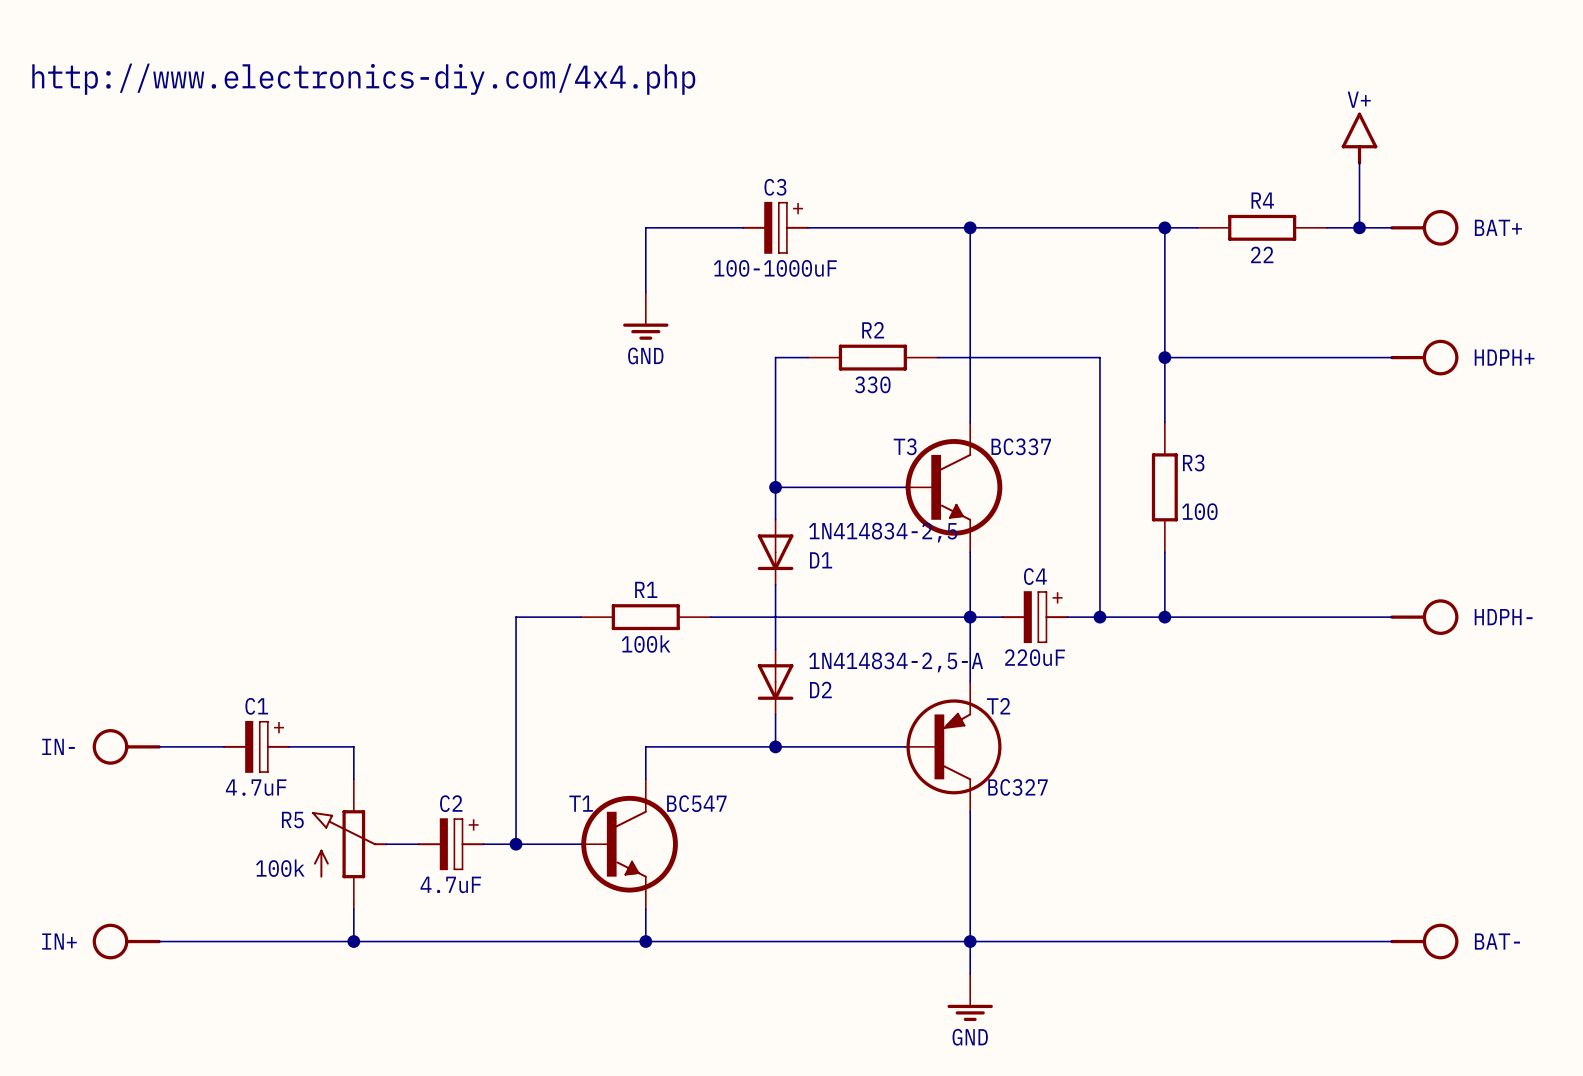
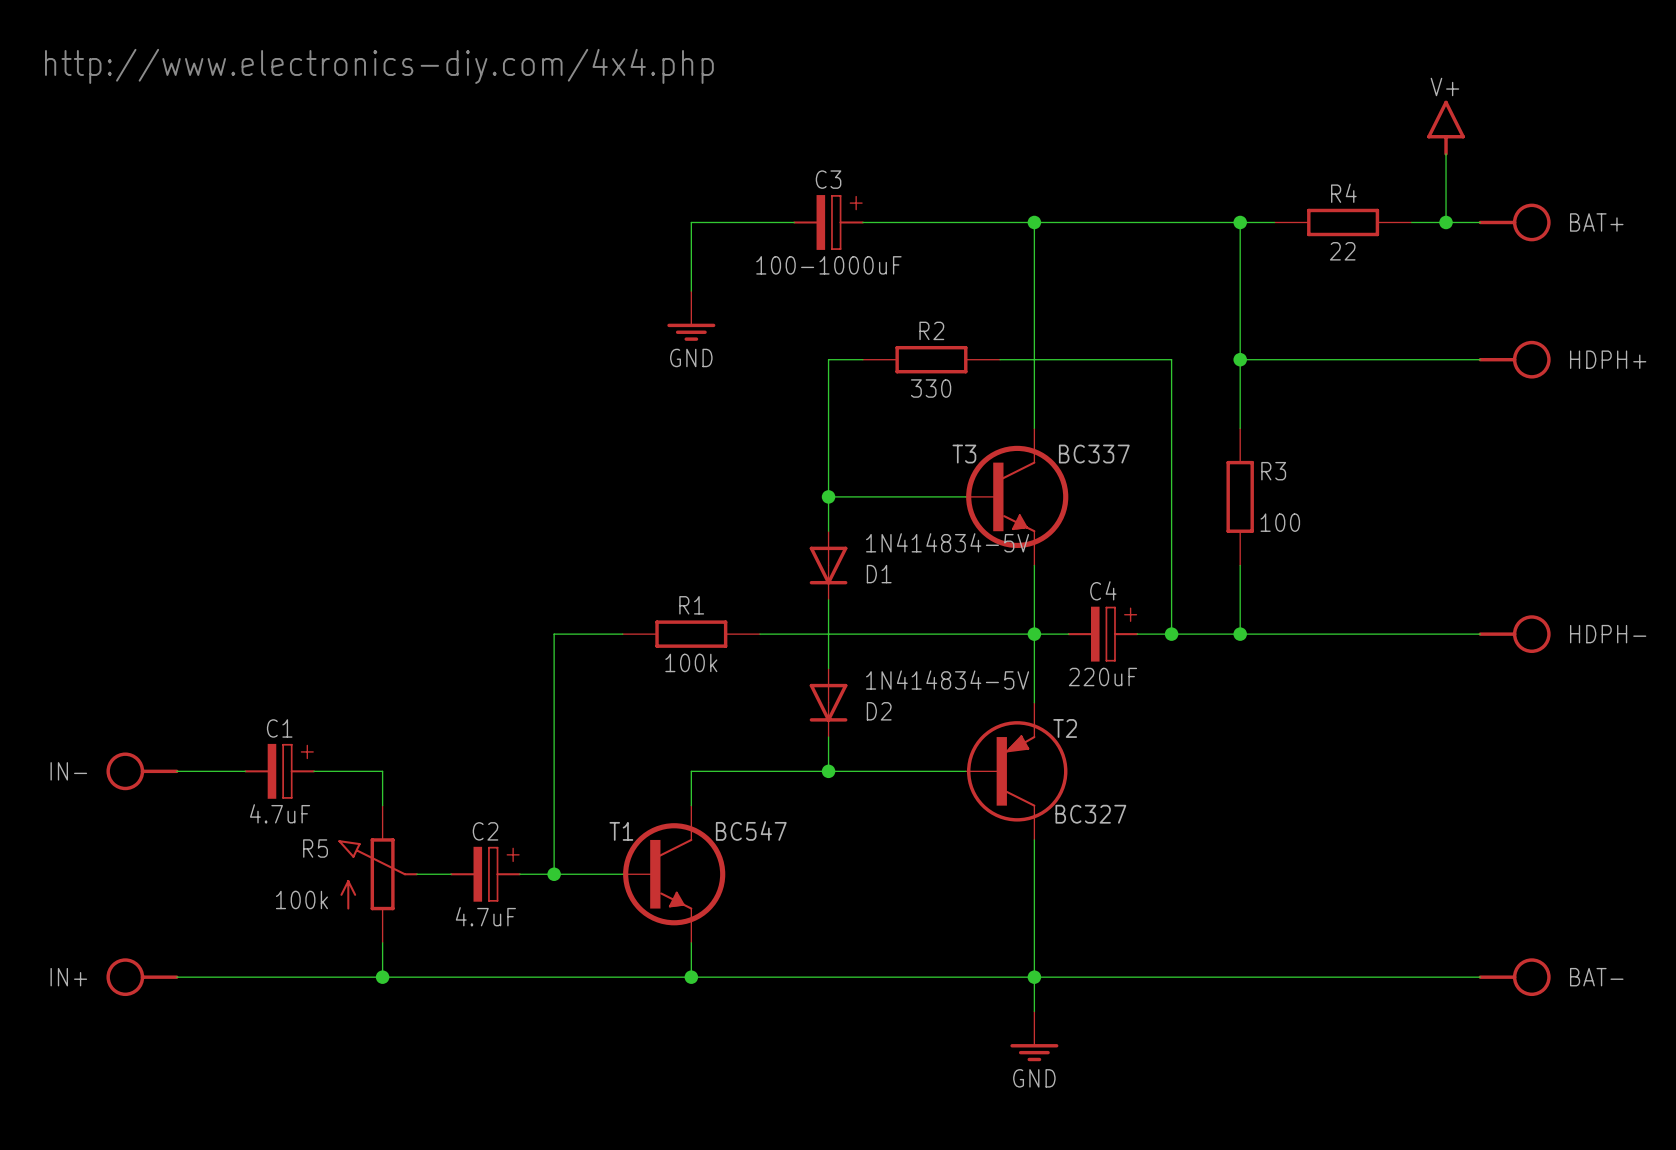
D1 value: 1N414834-2,5 (883, 532) -> 1N414834-5V (947, 542)
D2 value: 1N414834-2,5-A (896, 662) -> 1N414834-5V (947, 680)

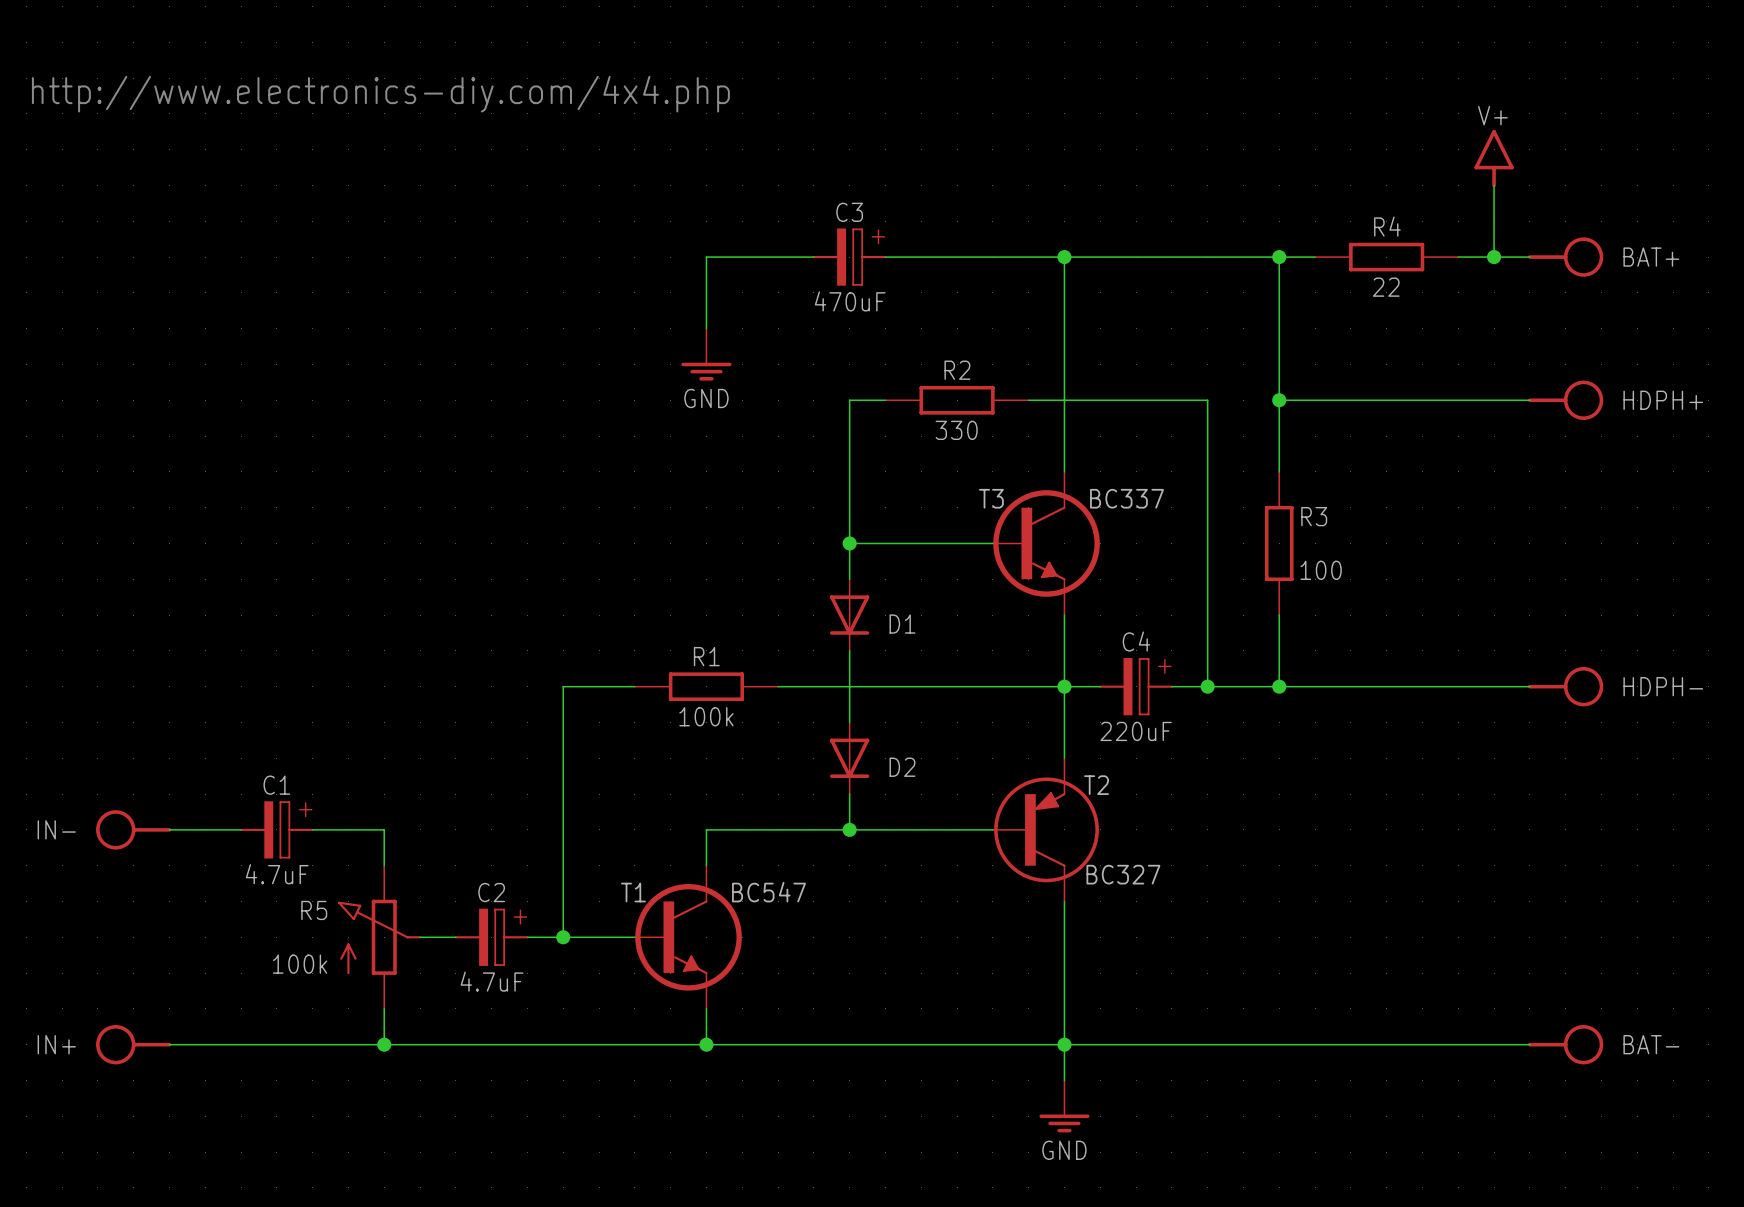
C3 value: 100-1000uF (828, 265) -> 470uF (850, 301)
D1 value: 1N414834-5V (947, 542) -> none
D2 value: 1N414834-5V (947, 680) -> none

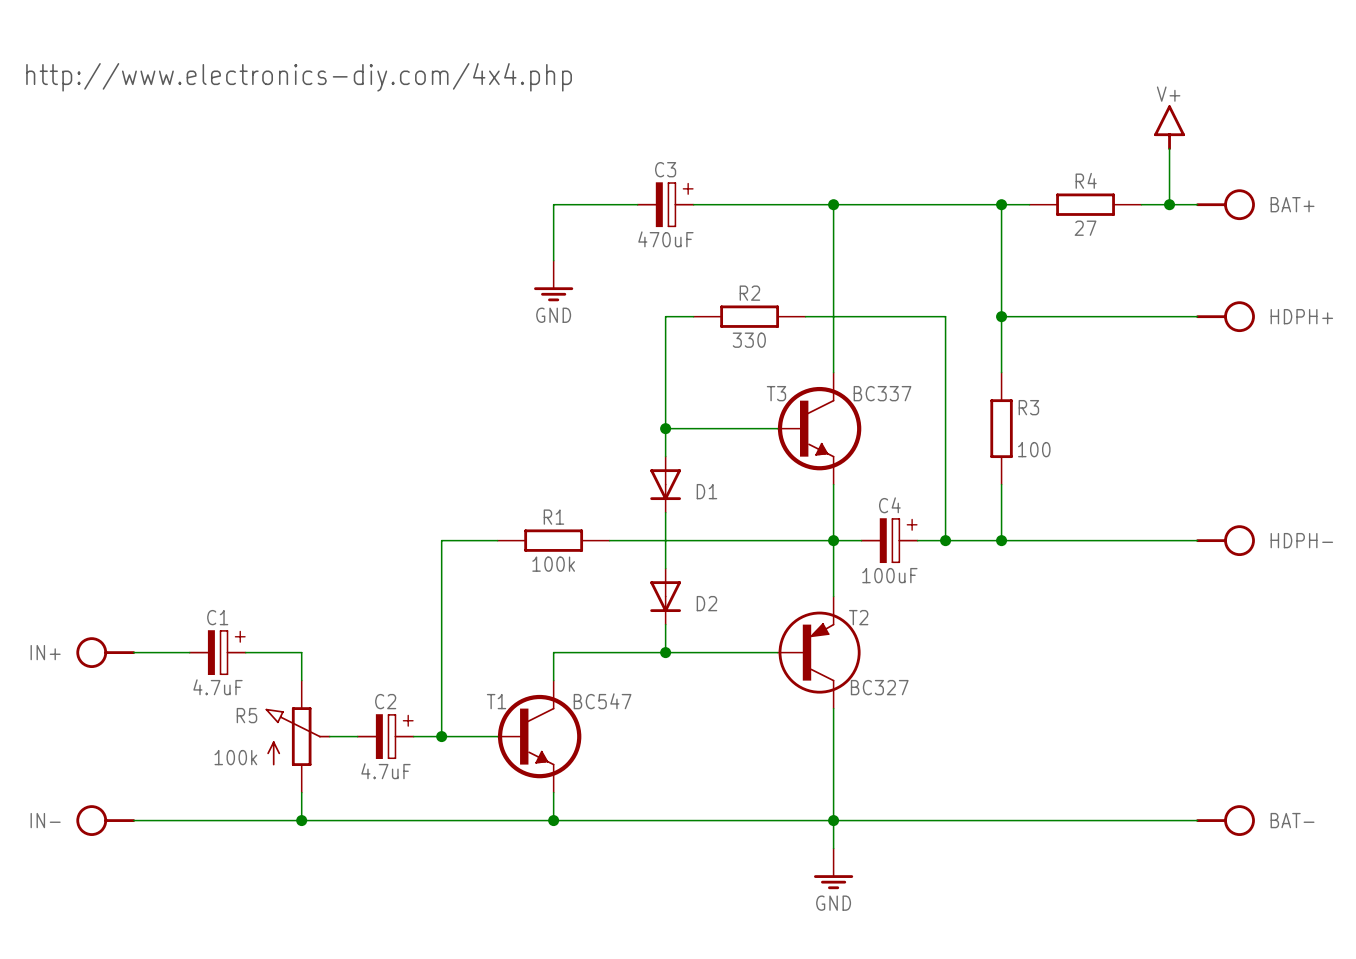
R4 value: 22 (1386, 287) -> 27 (1085, 228)
C4 value: 220uF (1136, 731) -> 100uF (889, 575)
IN- name: IN- (56, 829) -> IN+ (45, 652)
IN+ name: IN+ (56, 1044) -> IN- (45, 820)

